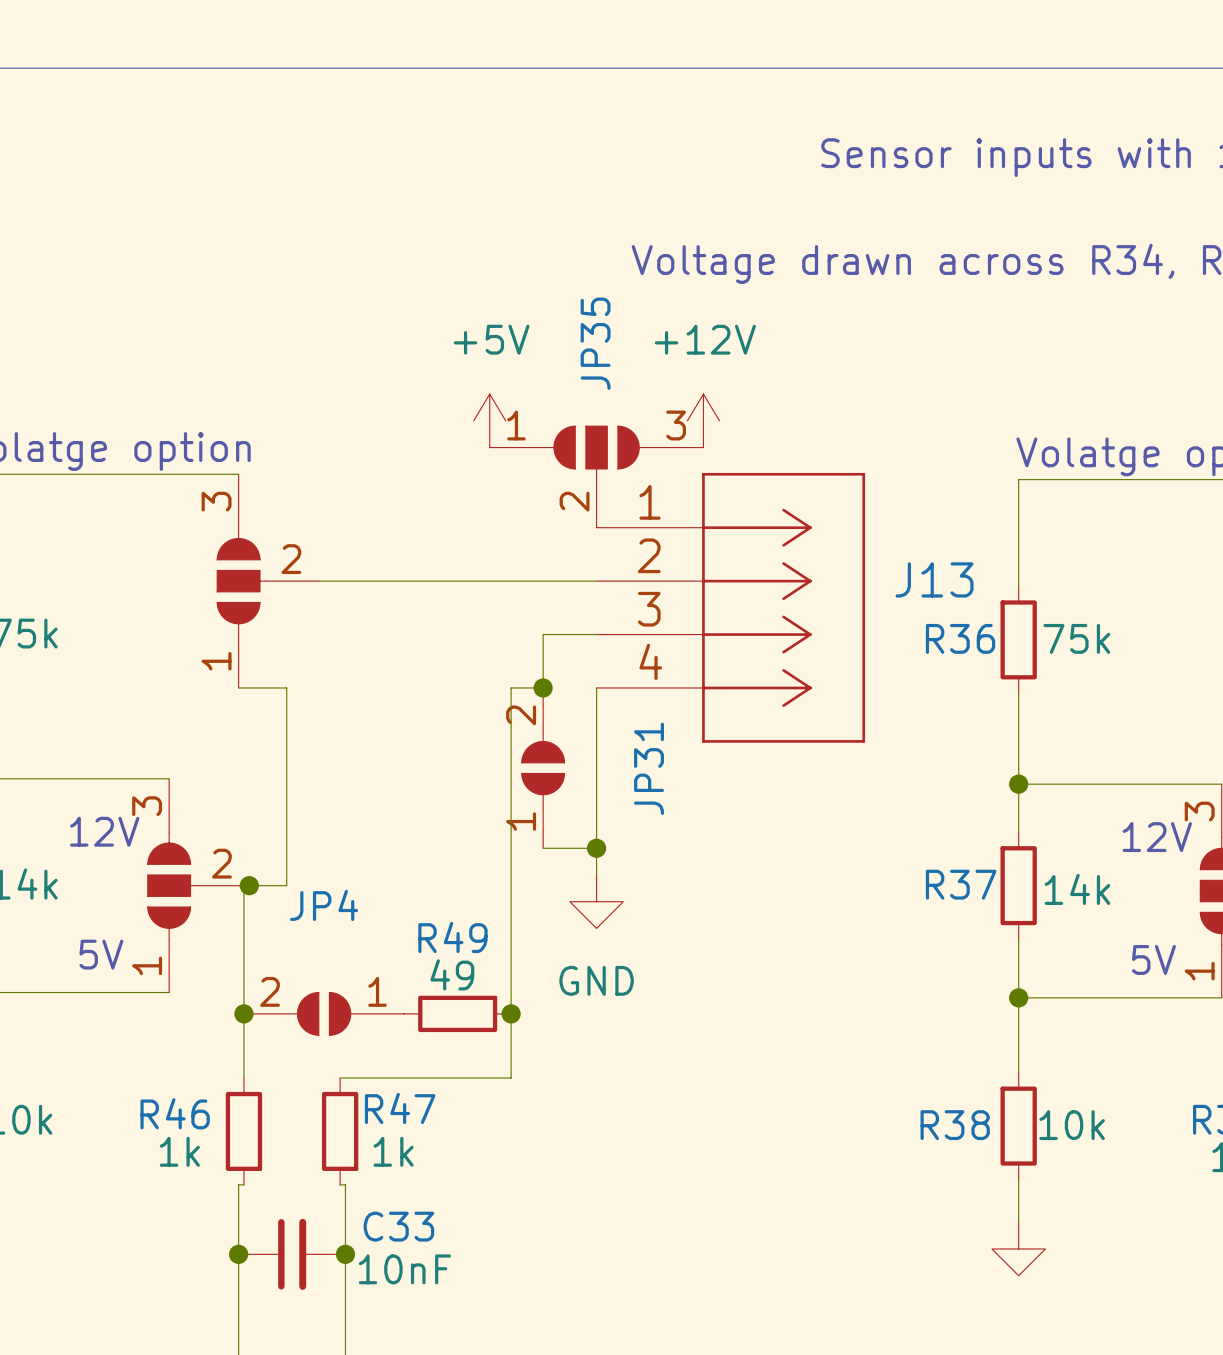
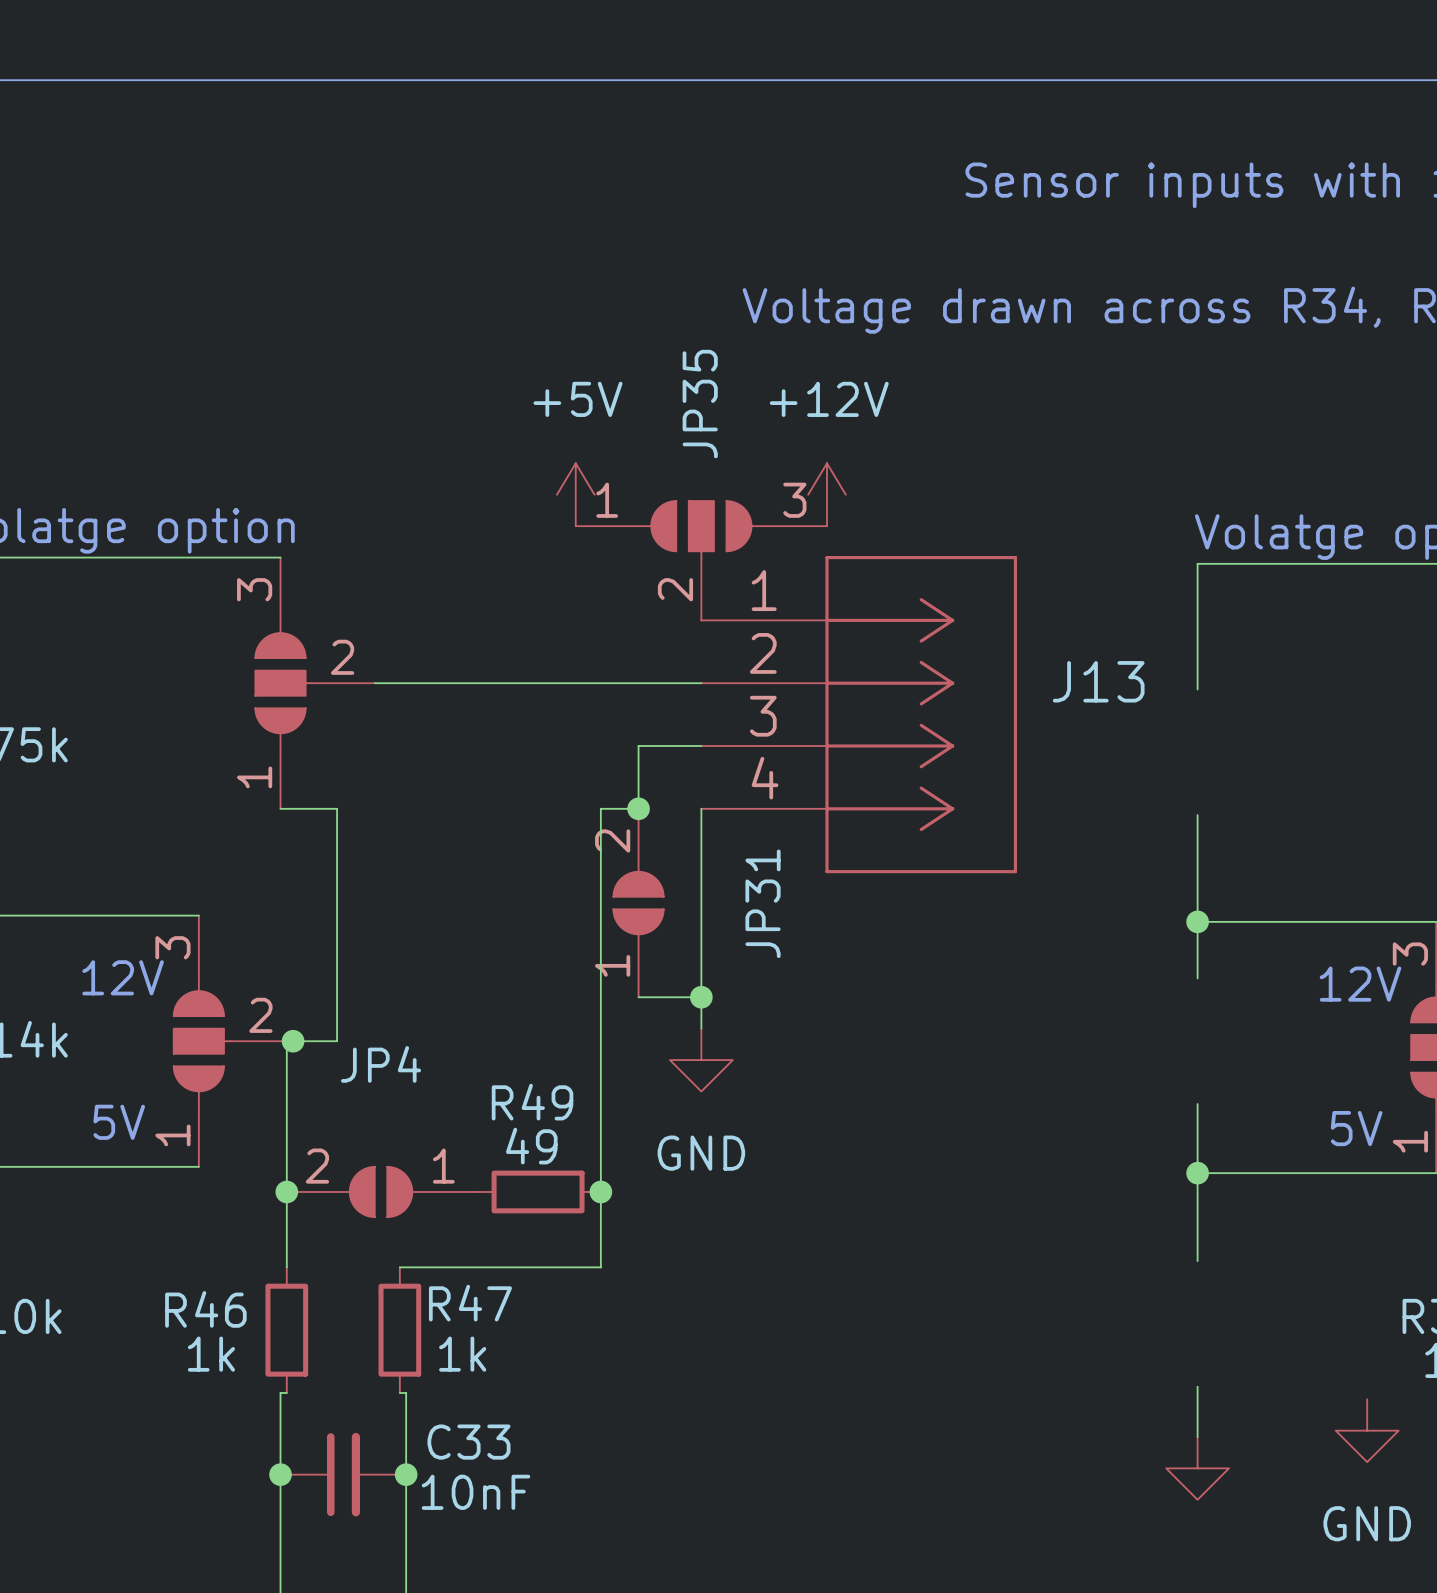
R36: 75k (1018, 639) -> none
R37: 14k (1018, 885) -> none
R38: 10k (1018, 1126) -> none
power symbol: none -> GND (1367, 1430)

